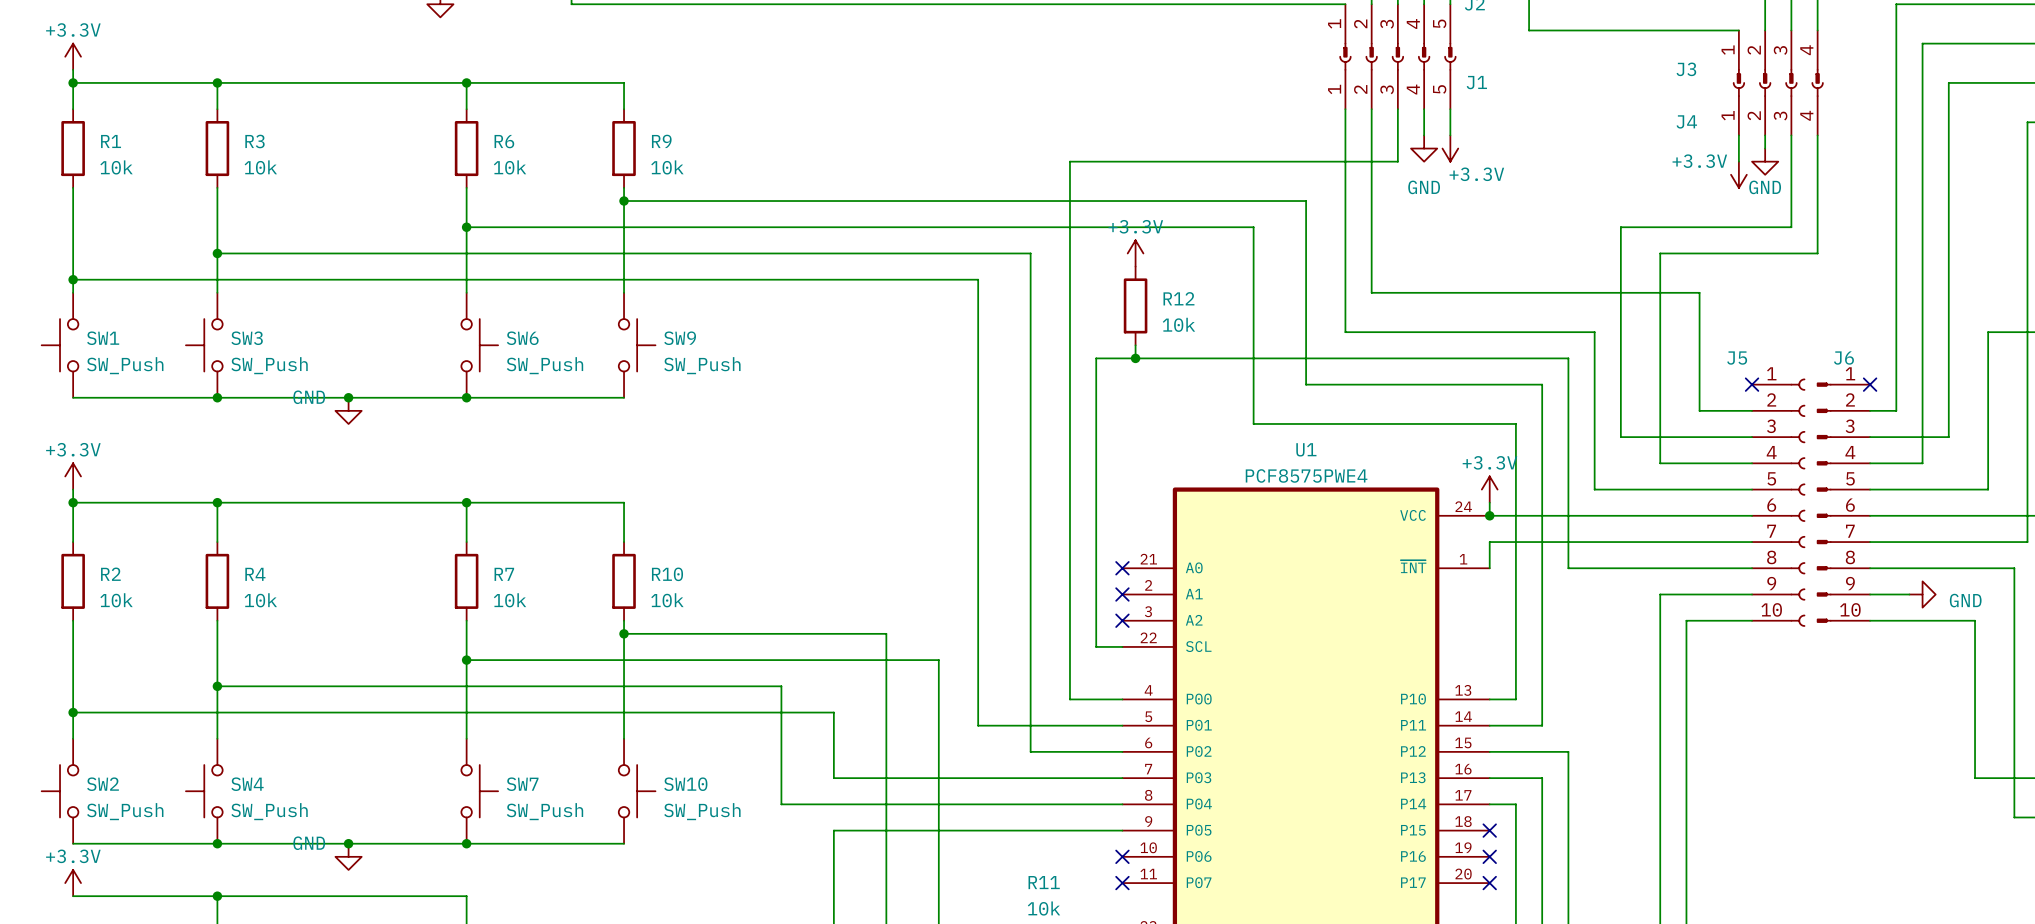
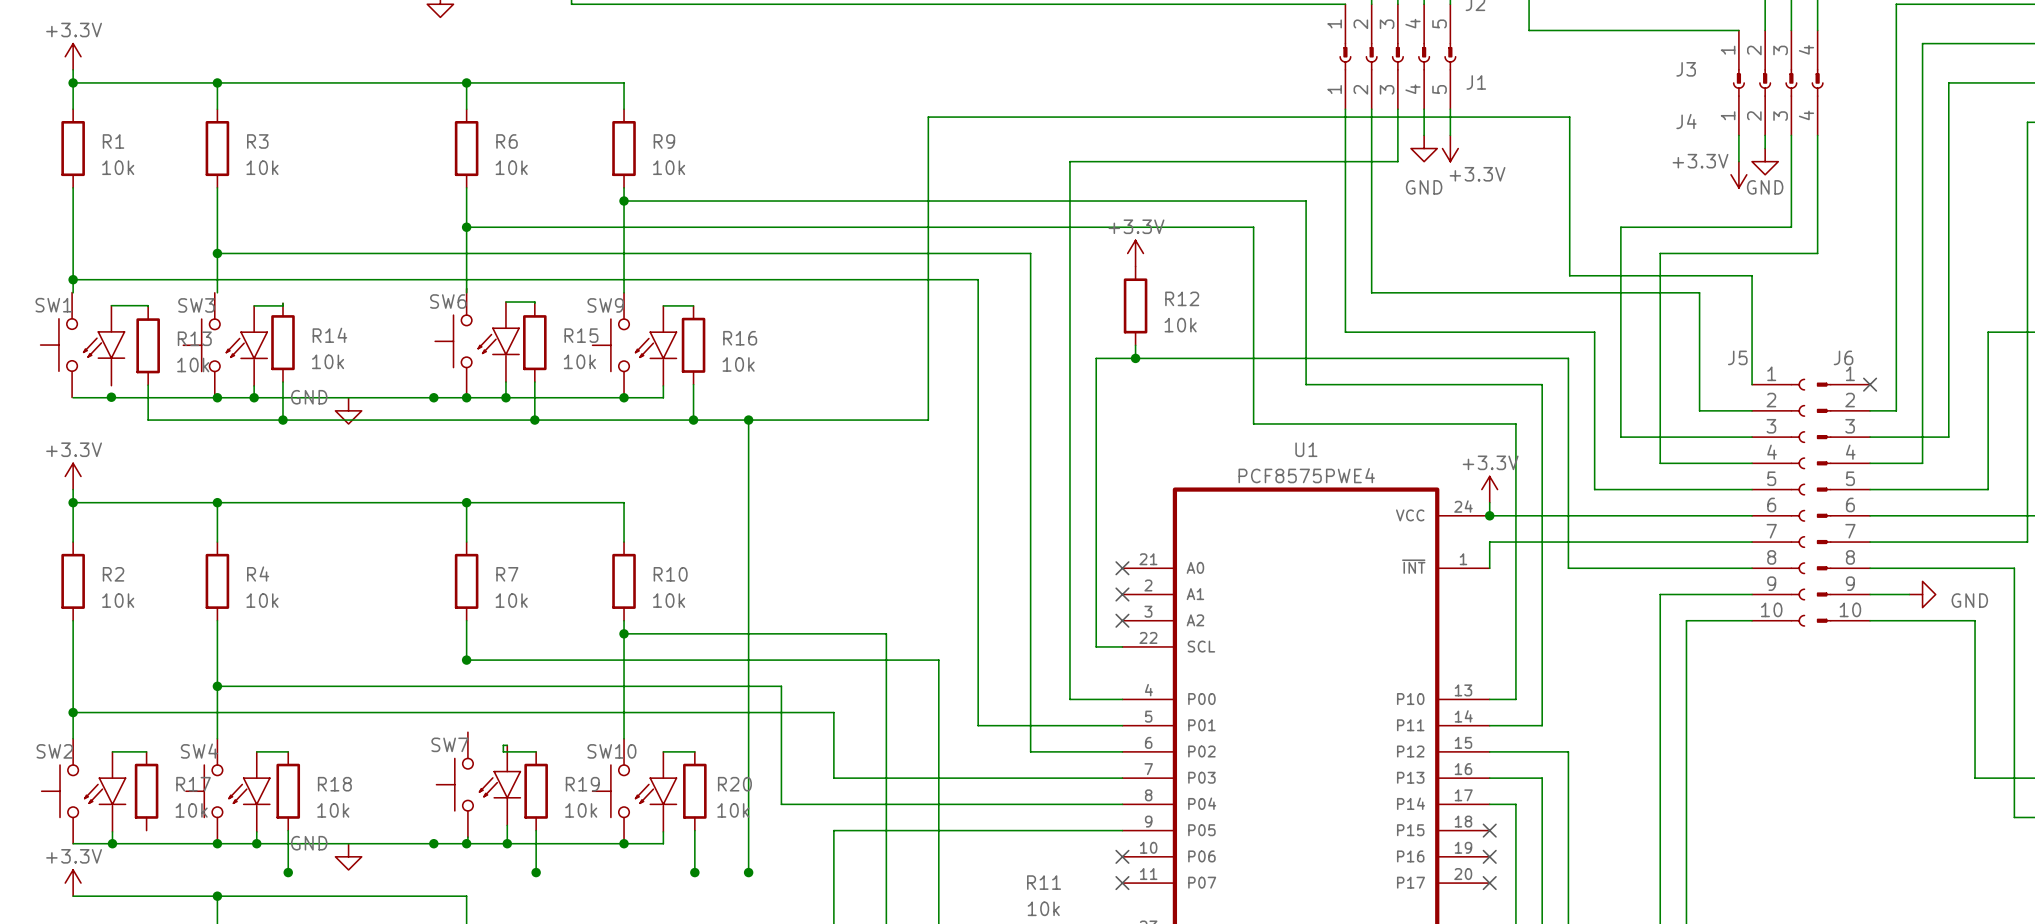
SW1 symbol: [41, 292, 79, 398] -> [40, 292, 125, 398]
SW3 symbol: [185, 292, 223, 398] -> [183, 292, 268, 398]
SW6 symbol: [461, 292, 499, 398] -> [435, 288, 520, 394]
SW9 symbol: [618, 292, 656, 398] -> [592, 292, 677, 398]
wire: none -> (505, 302) (534, 303)
wire: none -> (282, 303) (282, 305) (254, 305)
wire: none -> (111, 305) (148, 306)
wire: none -> (663, 305) (693, 305)
SW1 name position: SW1 (103, 338) -> SW1 (53, 305)
SW3 name position: SW3 (247, 338) -> SW3 (196, 305)
SW6 name position: SW6 (522, 338) -> SW6 (448, 301)
SW9 name position: SW9 (680, 338) -> SW9 (605, 305)
R14: none -> 10k (282, 342)
R15: none -> 10k (534, 342)
R13: none -> 10k (148, 345)
R16: none -> 10k (693, 345)
SW1 value: SW_Push (125, 365) -> none
SW3 value: SW_Push (269, 365) -> none
SW6 value: SW_Push (544, 365) -> none
SW9 value: SW_Push (702, 365) -> none
wire: none -> (282, 382) (282, 420)
wire: none -> (505, 382) (505, 397)
wire: none -> (534, 382) (534, 420)
wire: none -> (693, 384) (693, 420)
wire: none -> (1752, 384) (1752, 275) (1569, 275) (1569, 117) (928, 117) (928, 420) (148, 420) (148, 385)
no-connect mark: (1752, 384) -> none
wire: none -> (254, 385) (254, 397)
wire: none -> (663, 385) (663, 397) (624, 397)
junction: none -> (111, 397)
junction: none -> (254, 397)
junction: (348, 397) -> none
junction: none -> (433, 397)
junction: none -> (505, 397)
junction: none -> (624, 397)
junction: none -> (282, 420)
junction: none -> (534, 420)
junction: none -> (693, 420)
wire: none -> (748, 420) (748, 872)
junction: none -> (748, 420)
wire: (466, 660) (466, 738) -> none
SW2 symbol: [41, 738, 79, 844] -> [41, 738, 126, 844]
SW4 symbol: [185, 738, 223, 844] -> [185, 738, 270, 844]
SW7 symbol: [461, 738, 499, 844] -> [436, 732, 521, 838]
SW10 symbol: [618, 738, 656, 844] -> [592, 738, 677, 844]
wire: none -> (507, 745) (503, 745) (503, 751) (536, 751)
wire: none -> (112, 751) (146, 751)
wire: none -> (256, 751) (288, 751)
wire: none -> (663, 751) (694, 751)
SW2 name position: SW2 (102, 784) -> SW2 (54, 751)
SW4 name position: SW4 (247, 784) -> SW4 (199, 751)
SW7 name position: SW7 (522, 784) -> SW7 (449, 744)
SW10 name position: SW10 (685, 784) -> SW10 (611, 751)
R17: none -> 10k (146, 791)
R18: none -> 10k (288, 791)
R19: none -> 10k (536, 791)
R20: none -> 10k (694, 791)
SW2 value: SW_Push (125, 811) -> none
SW4 value: SW_Push (269, 811) -> none
SW7 value: SW_Push (544, 811) -> none
SW10 value: SW_Push (702, 811) -> none
wire: none -> (507, 825) (507, 843)
wire: none -> (288, 830) (288, 872)
wire: none -> (536, 830) (536, 872)
wire: none -> (694, 830) (694, 872)
wire: none -> (112, 831) (112, 843)
wire: none -> (256, 831) (256, 843)
wire: none -> (663, 831) (663, 843) (624, 843)
junction: none -> (112, 843)
junction: none -> (256, 843)
junction: (348, 843) -> none
junction: none -> (433, 843)
junction: none -> (507, 843)
junction: none -> (624, 843)
junction: none -> (288, 872)
junction: none -> (536, 872)
junction: none -> (694, 872)
junction: none -> (748, 872)

